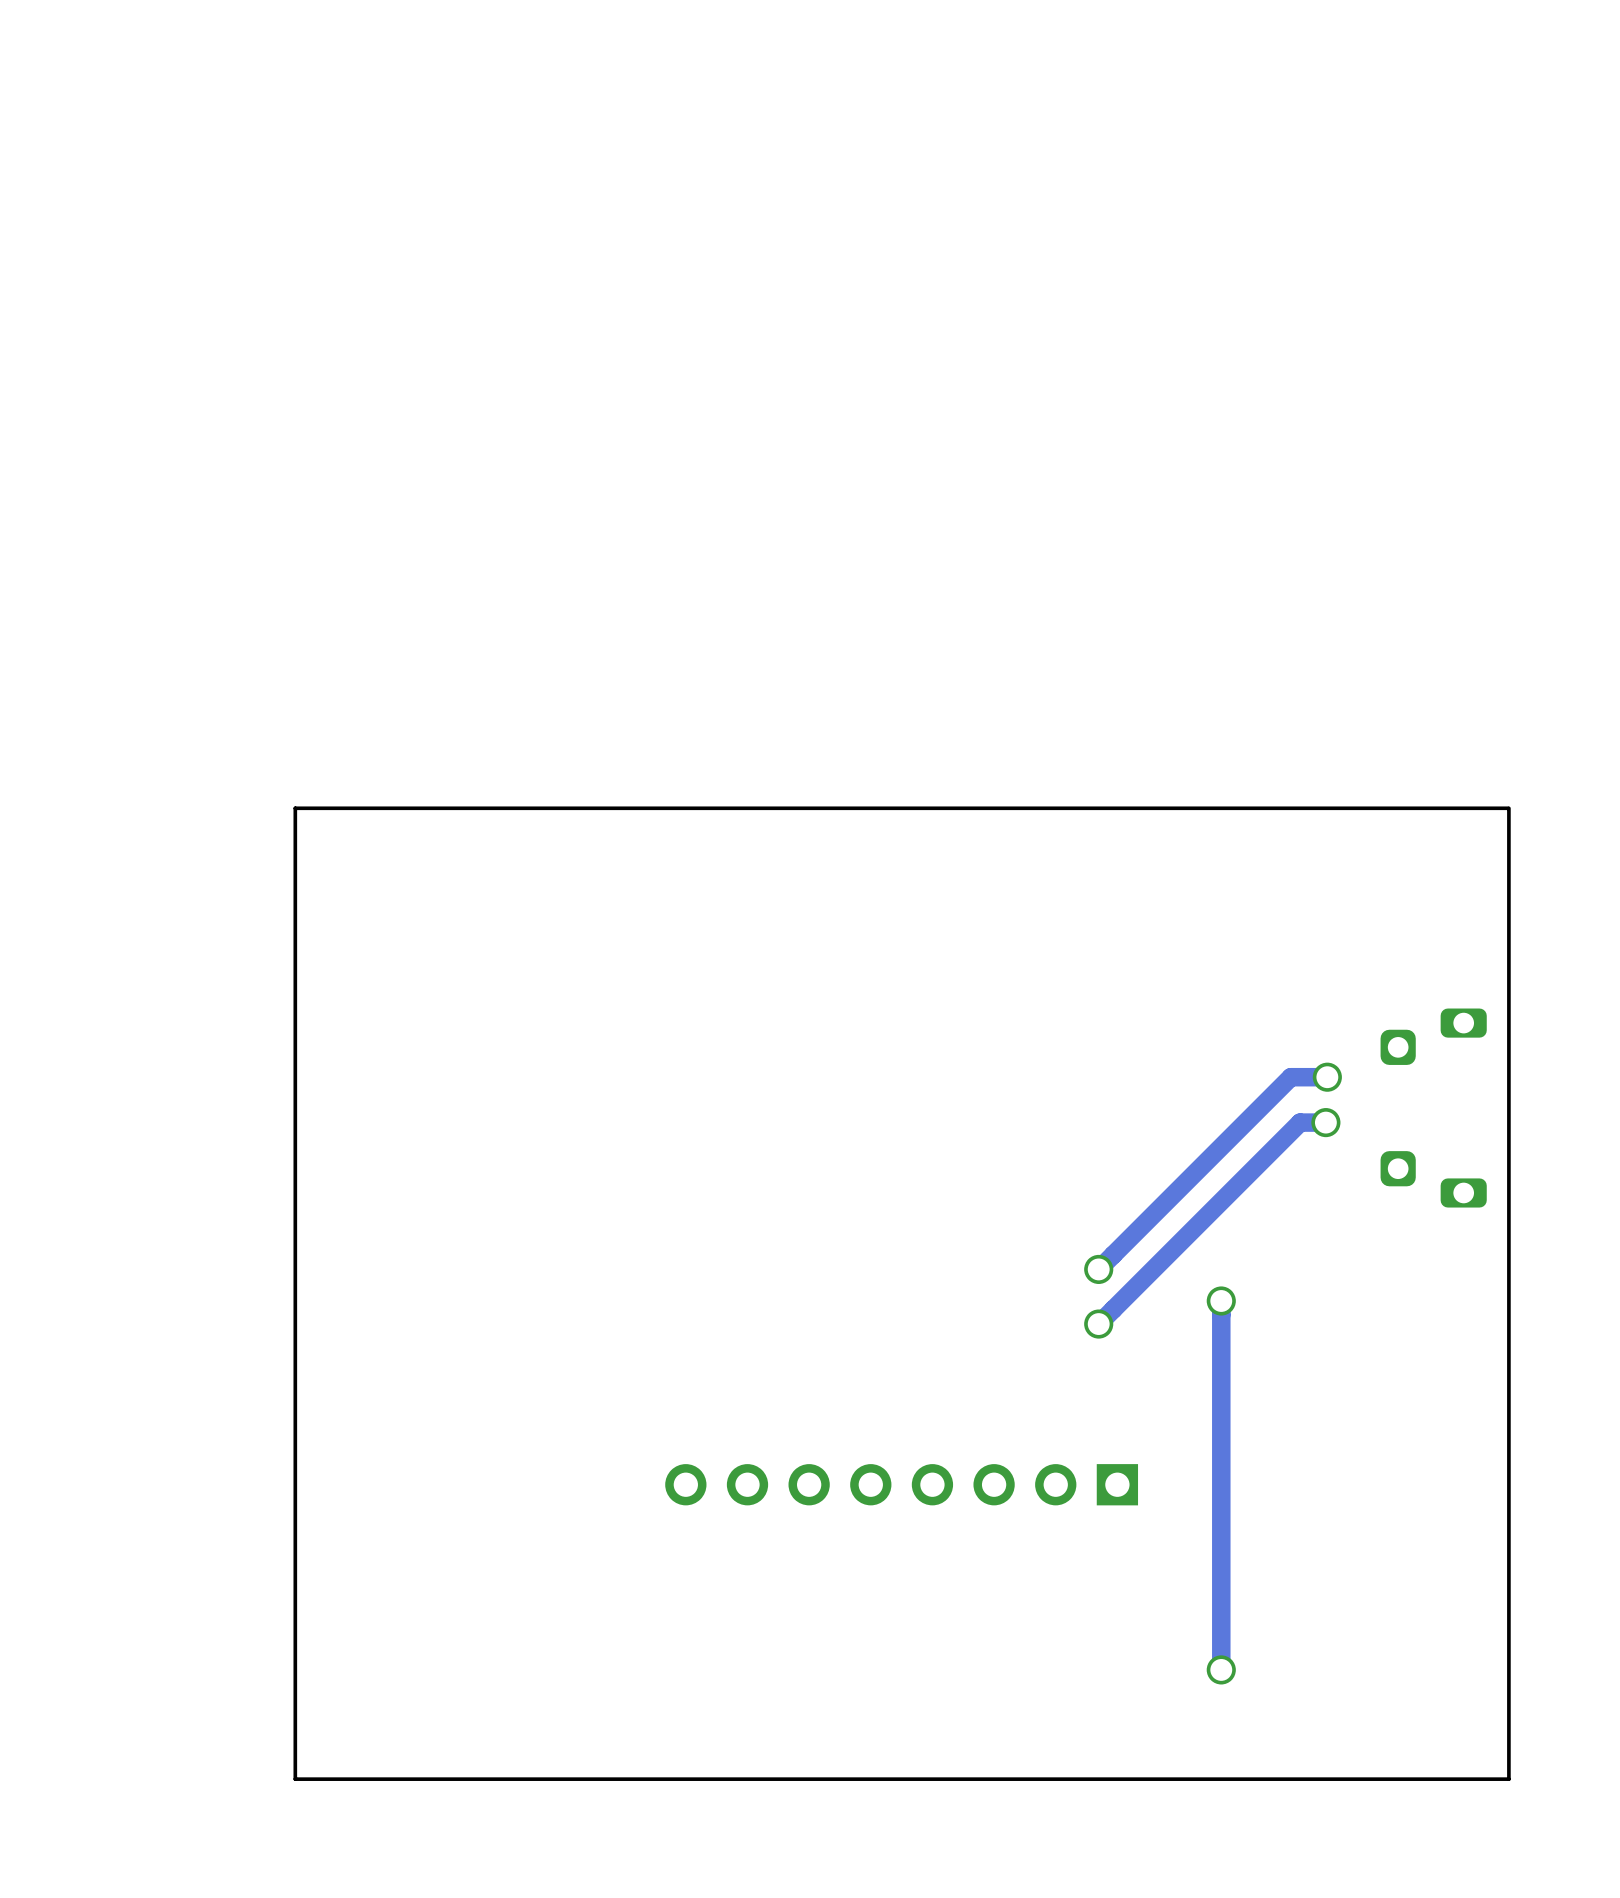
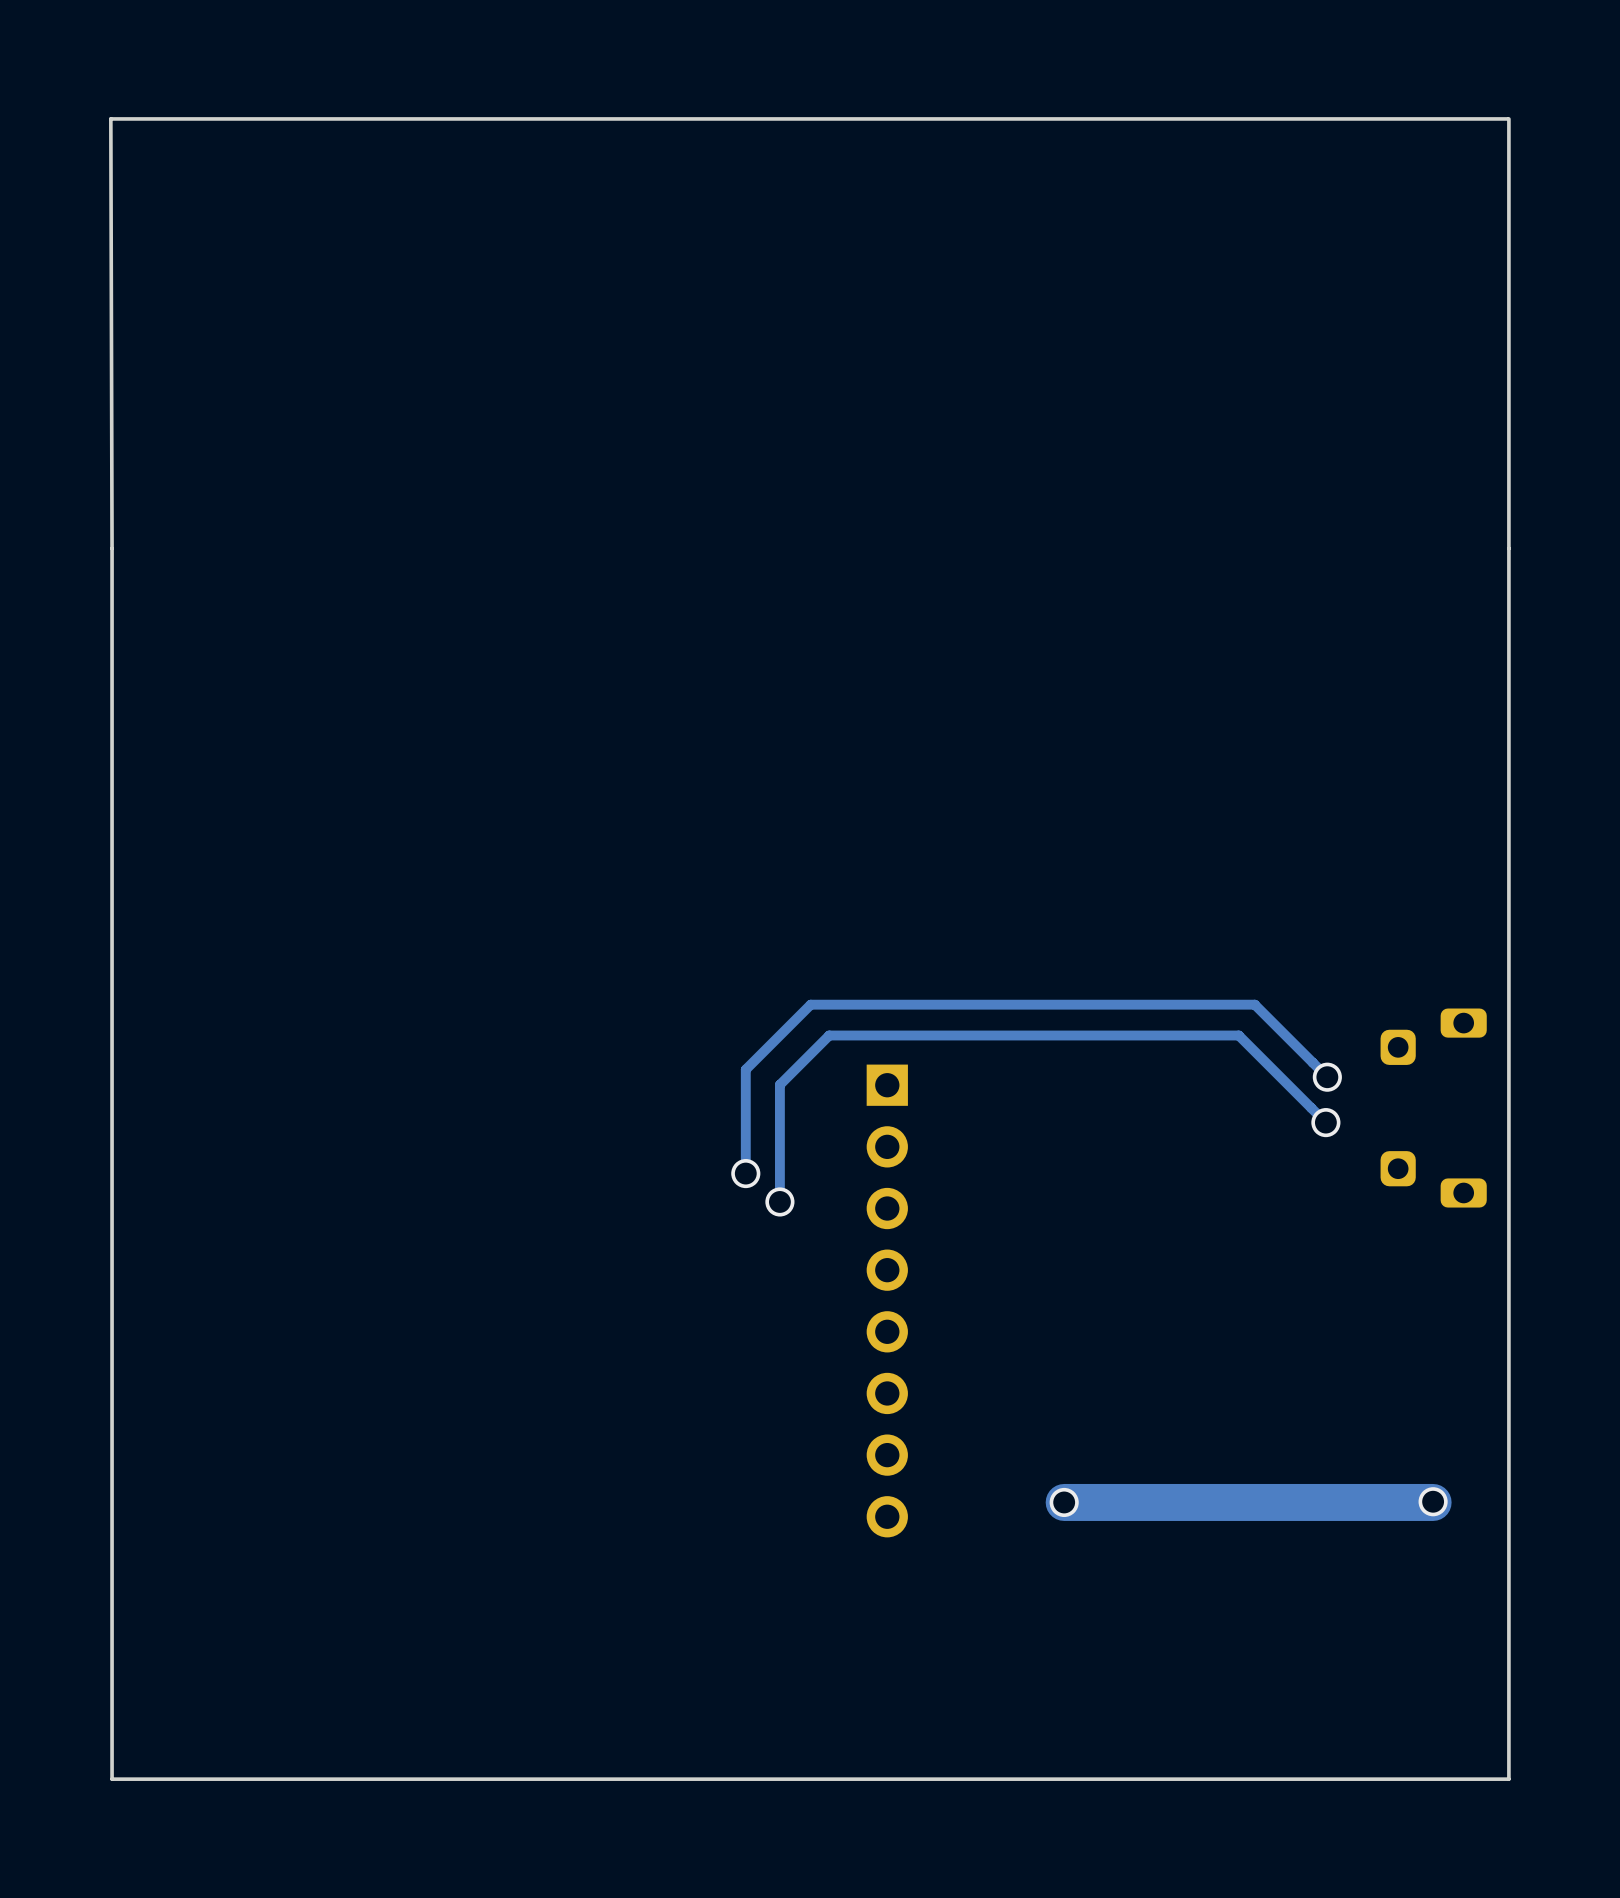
board edge: none -> (1508, 118) (1508, 808)
board edge: (1507, 808) (295, 808) (295, 1779) -> (1507, 118) (110, 118) (112, 1779) (295, 1779)
track: (1327, 1077) (1290, 1077) (1098, 1269) -> (1327, 1077) (1254, 1004) (810, 1004) (745, 1069) (745, 1173)
track: (1325, 1122) (1300, 1122) (1098, 1324) -> (1325, 1122) (1238, 1035) (829, 1035) (779, 1084) (779, 1201)
via: none -> (745, 1173)
via: none -> (779, 1201)
via: (1098, 1269) -> none
track: (1221, 1300) (1221, 1669) -> none
via: (1221, 1300) -> none
via: (1098, 1324) -> none
part rotation: 0° (901, 1484) -> 90° counterclockwise (887, 1300)
via: none -> (1433, 1501)
via: none -> (1064, 1502)
track: none -> (1433, 1502) (1064, 1502)
via: (1221, 1669) -> none

